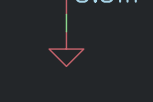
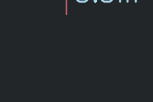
wire: (66, 14) (66, 31) -> none
power symbol: (66, 49) -> none

